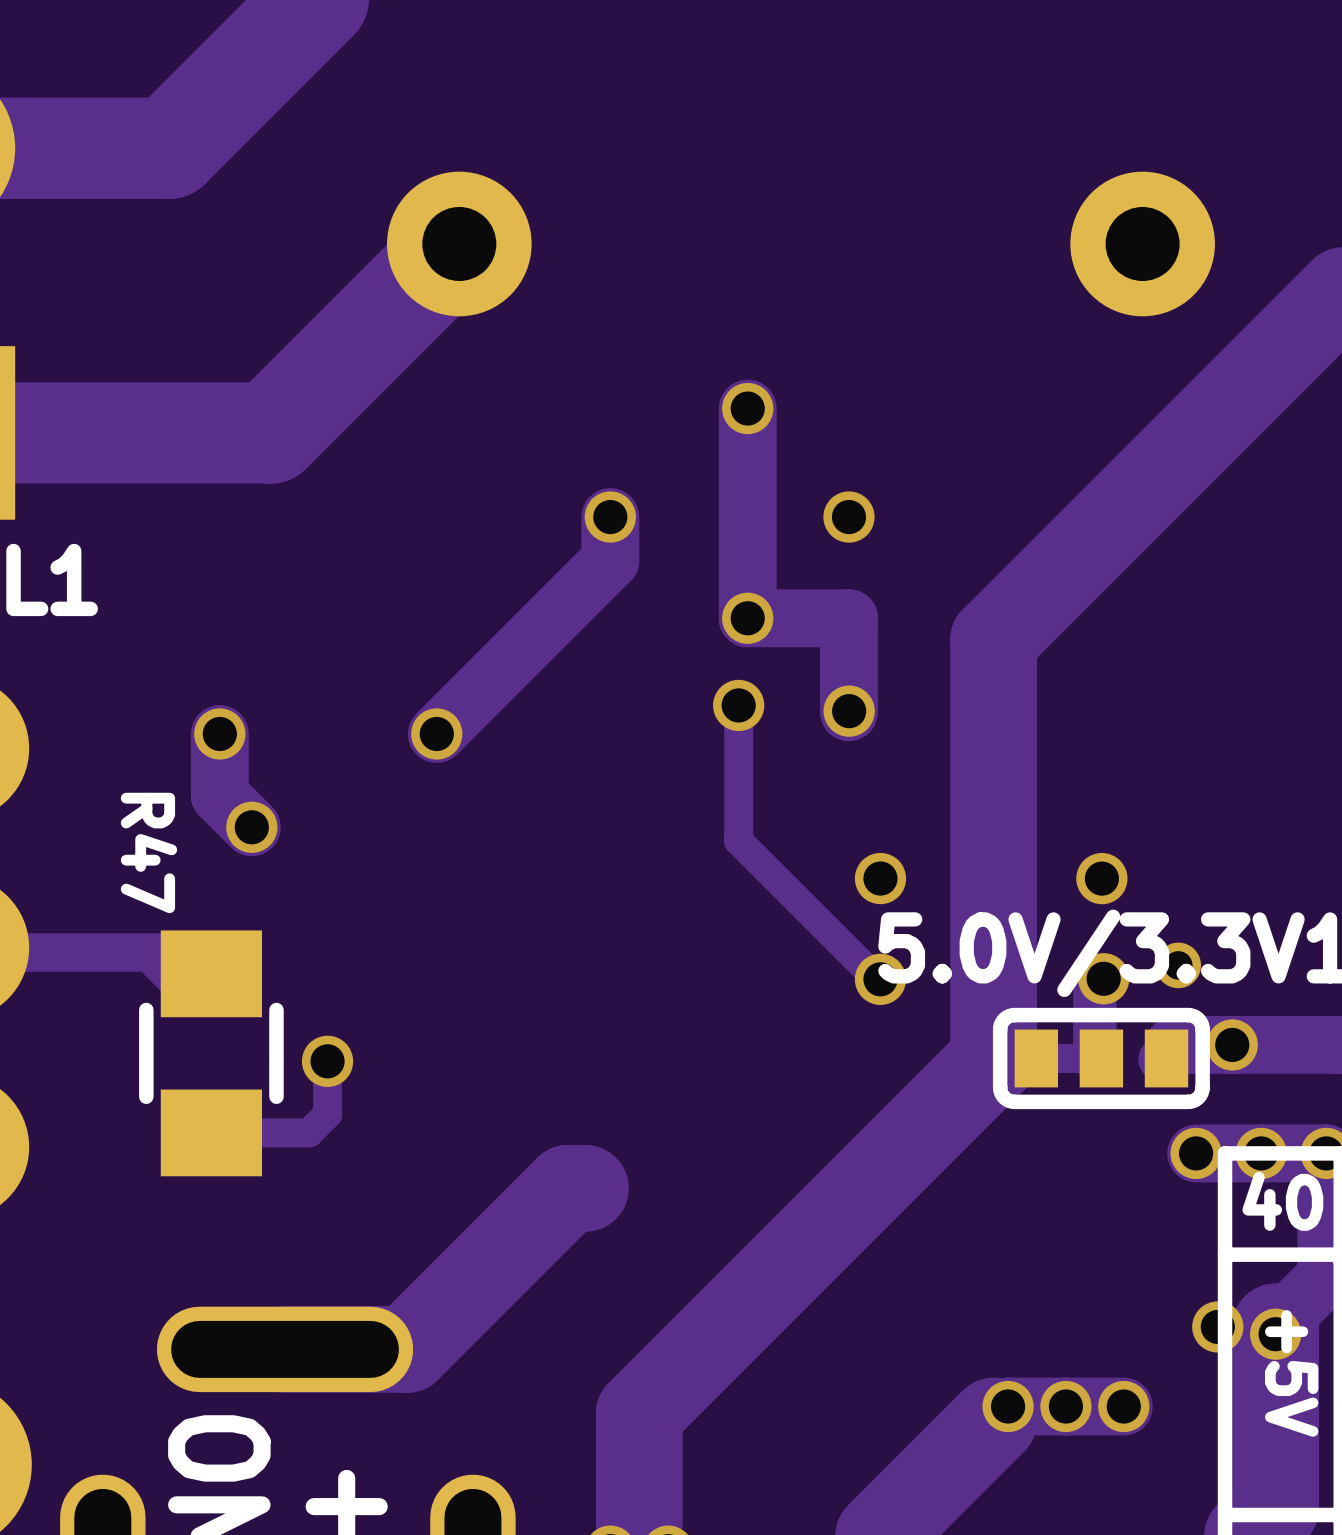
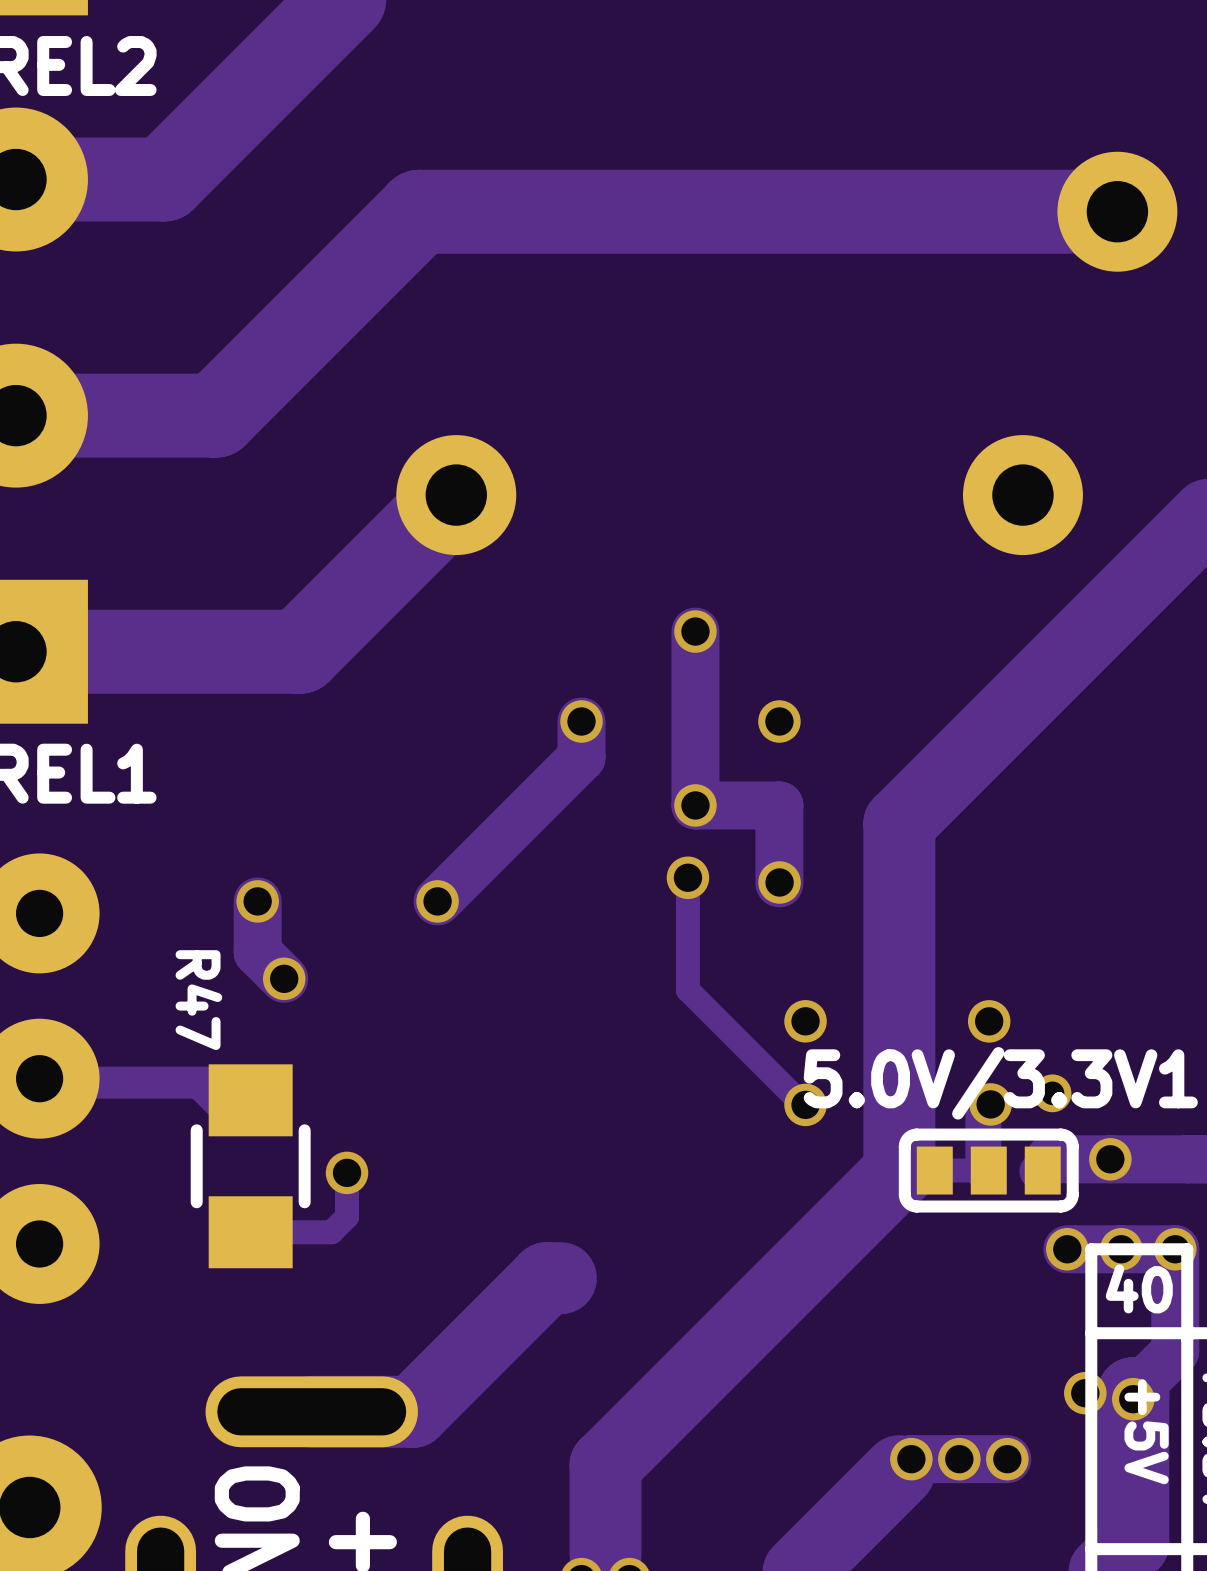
via position: (1232, 1044) -> (1110, 1159)

